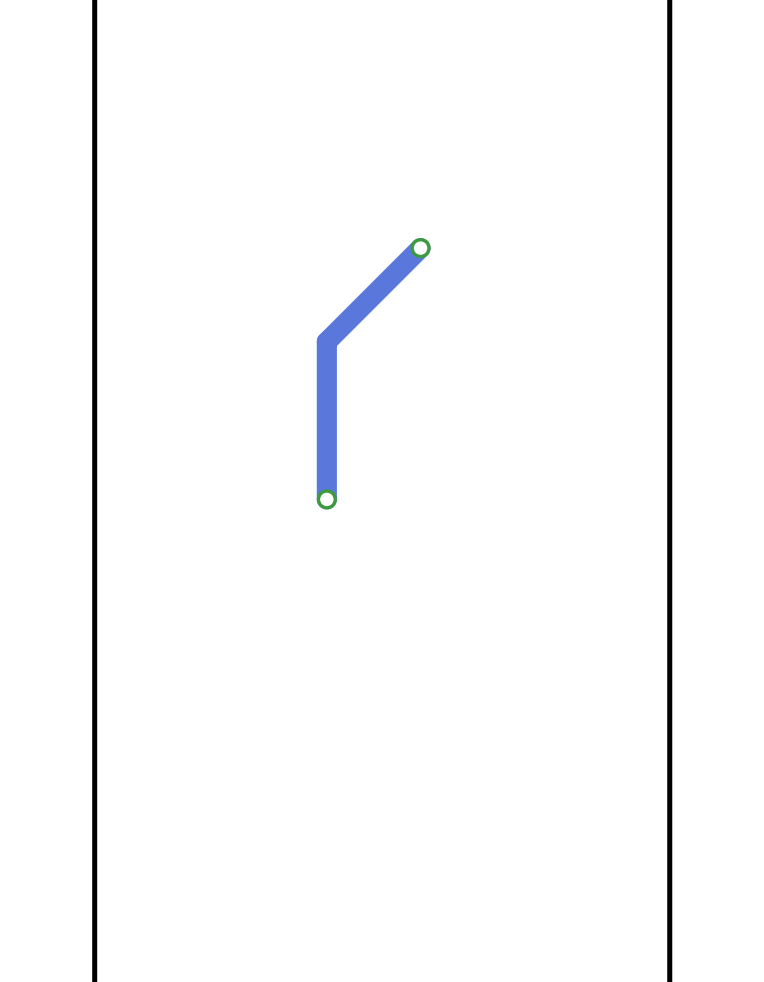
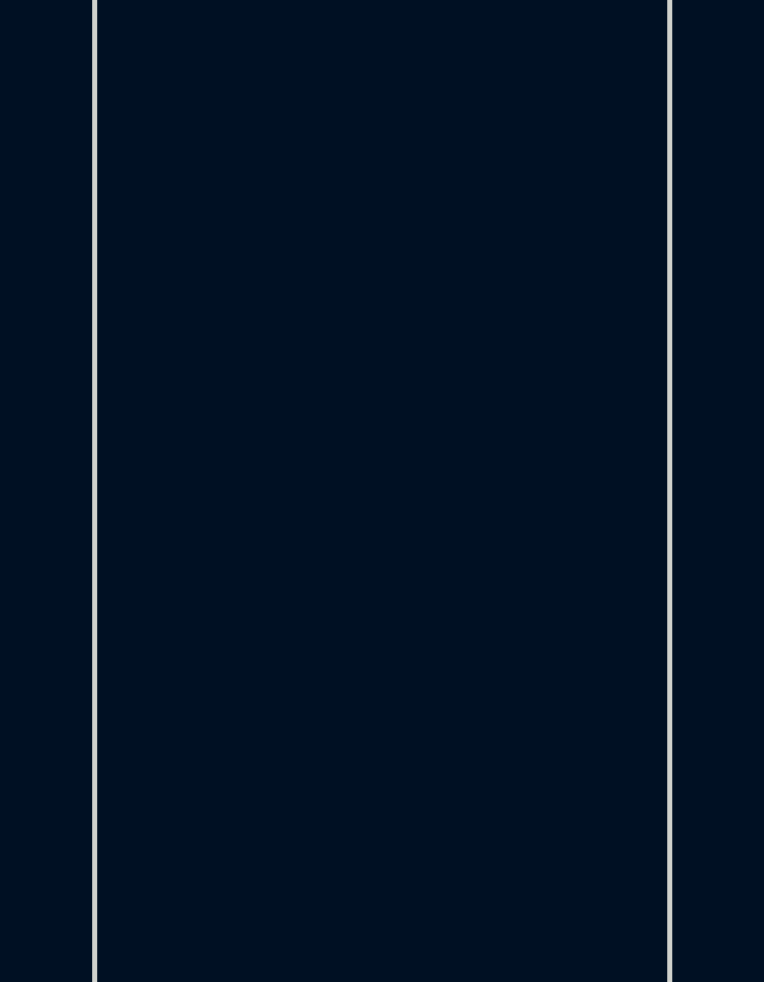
track: (420, 248) (326, 341) (326, 499) -> none
via: (420, 248) -> none
via: (326, 499) -> none

